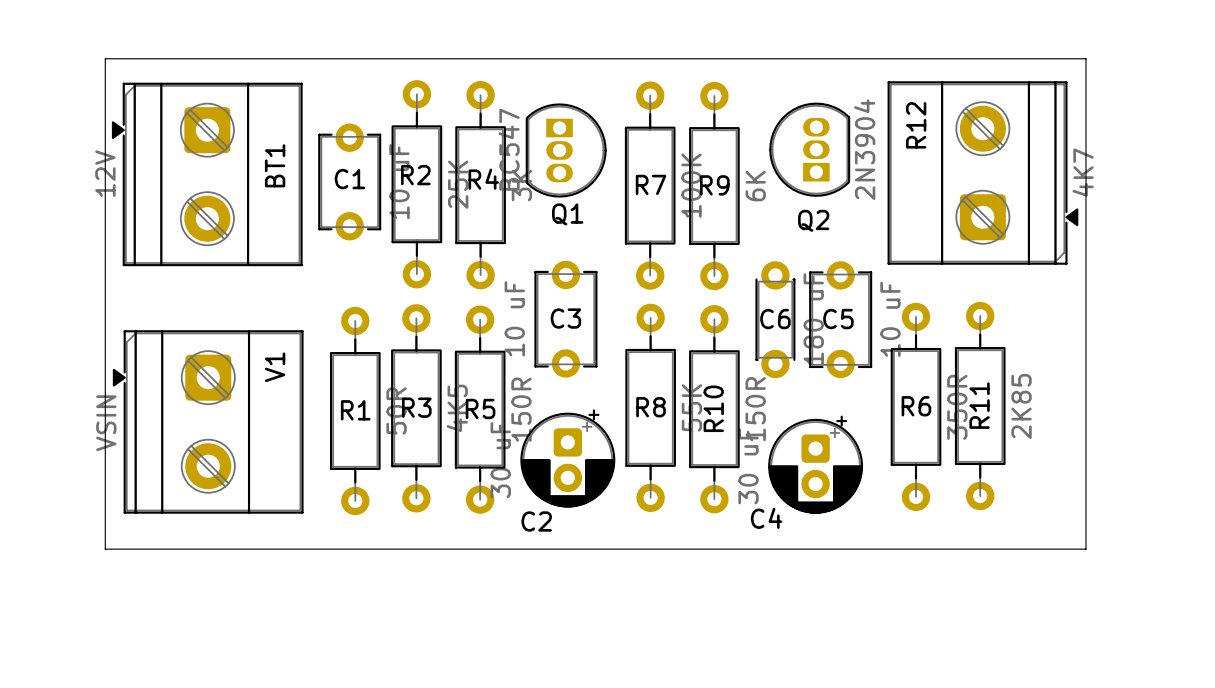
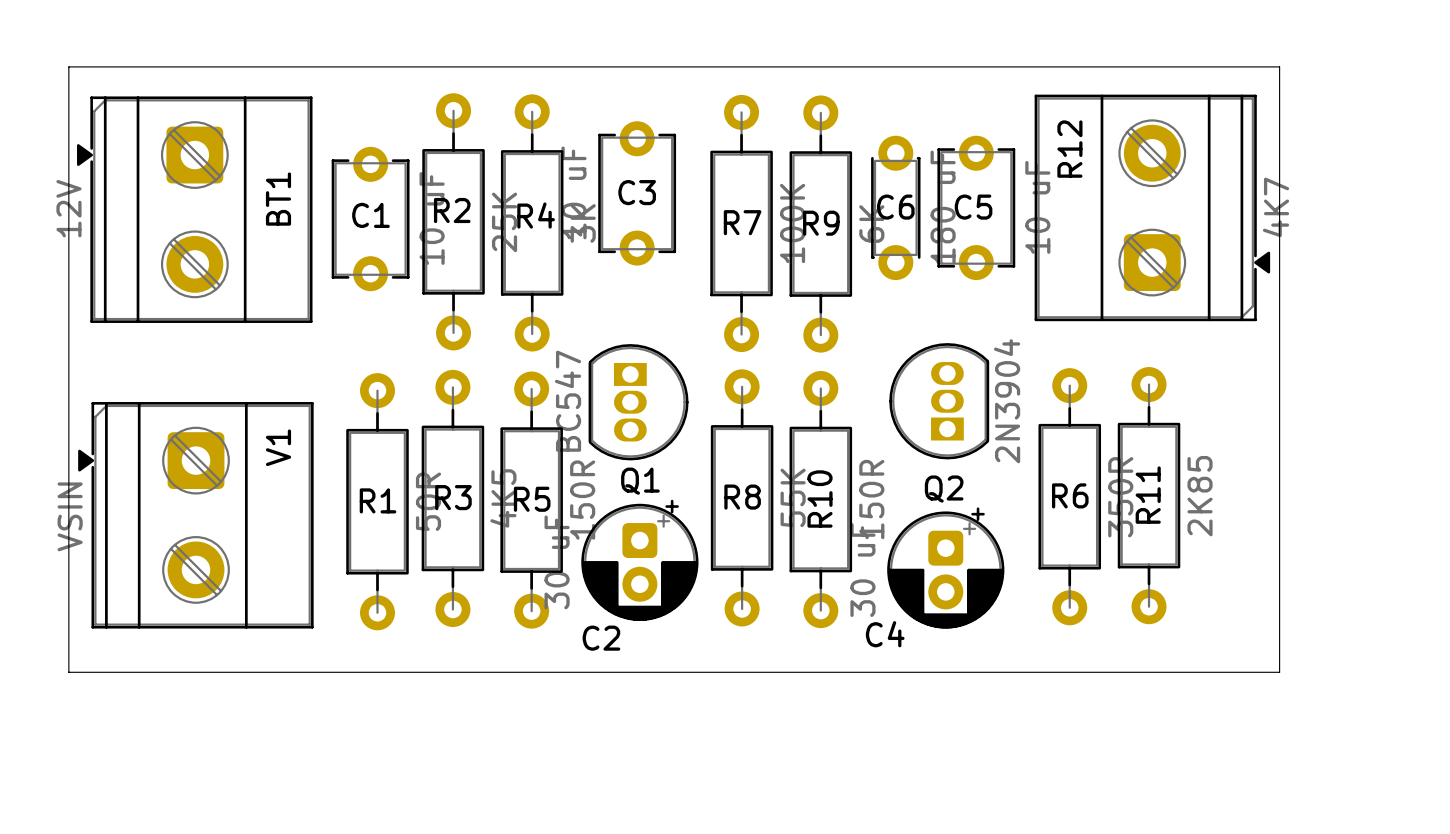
Q2 position: (809, 149) -> (939, 401)
Q1 position: (566, 150) -> (638, 402)
C3 position: (565, 319) -> (637, 193)
C6 position: (775, 319) -> (895, 207)
C5 position: (840, 319) -> (976, 207)

